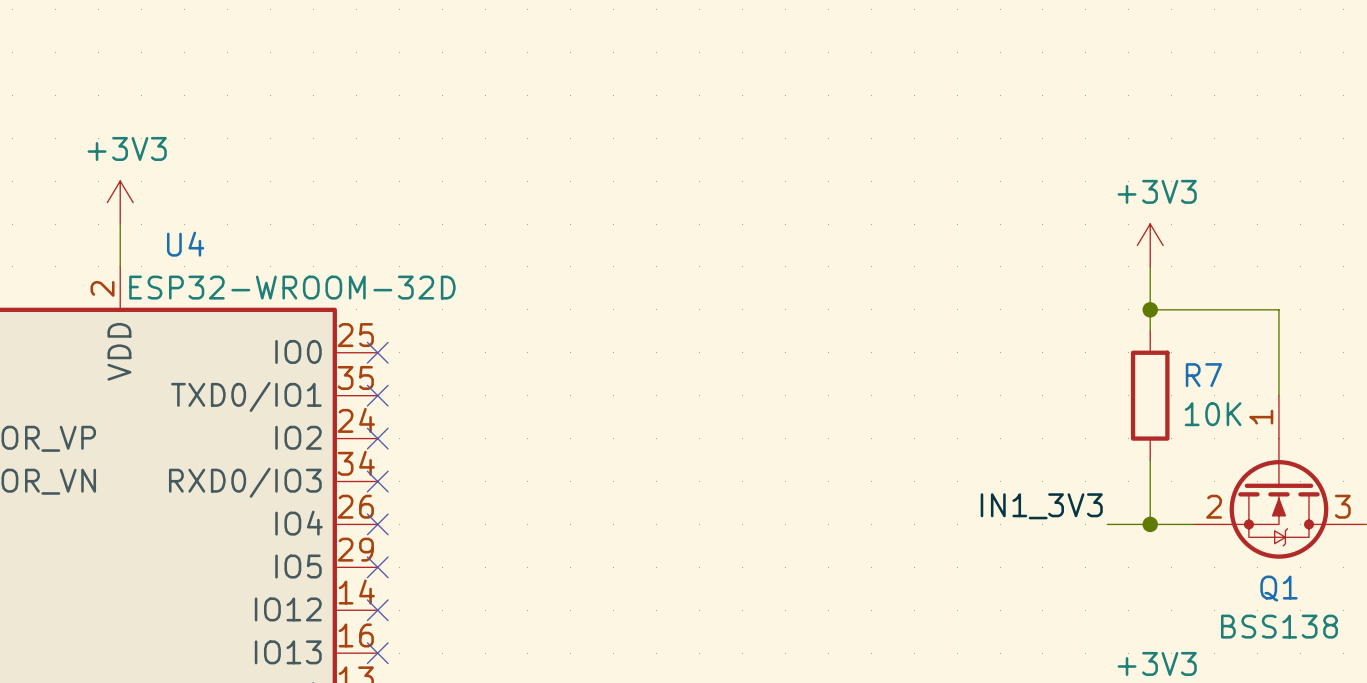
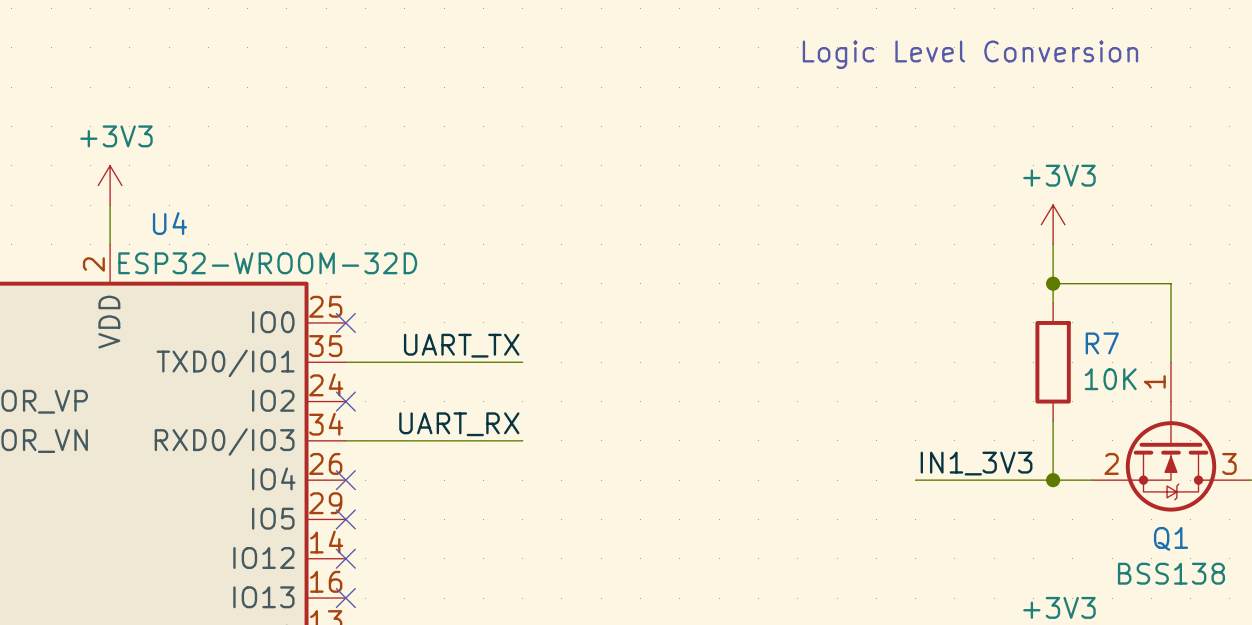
text: none -> Logic Level Conversion (970, 54)
label: none -> UART_TX (461, 345)
wire: none -> (345, 362) (522, 362)
no-connect mark: (377, 395) -> none
label: none -> UART_RX (459, 424)
wire: none -> (345, 440) (522, 440)
no-connect mark: (377, 481) -> none
label position: IN1_3V3 (1041, 506) -> IN1_3V3 (976, 463)
wire: none -> (915, 480) (1013, 480)

